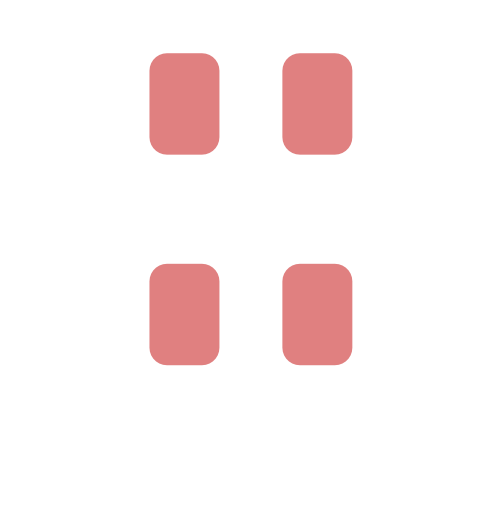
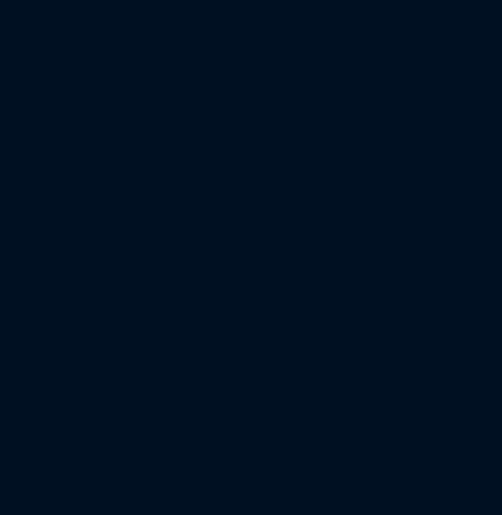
part: (250, 103) -> none
part: (250, 314) -> none

